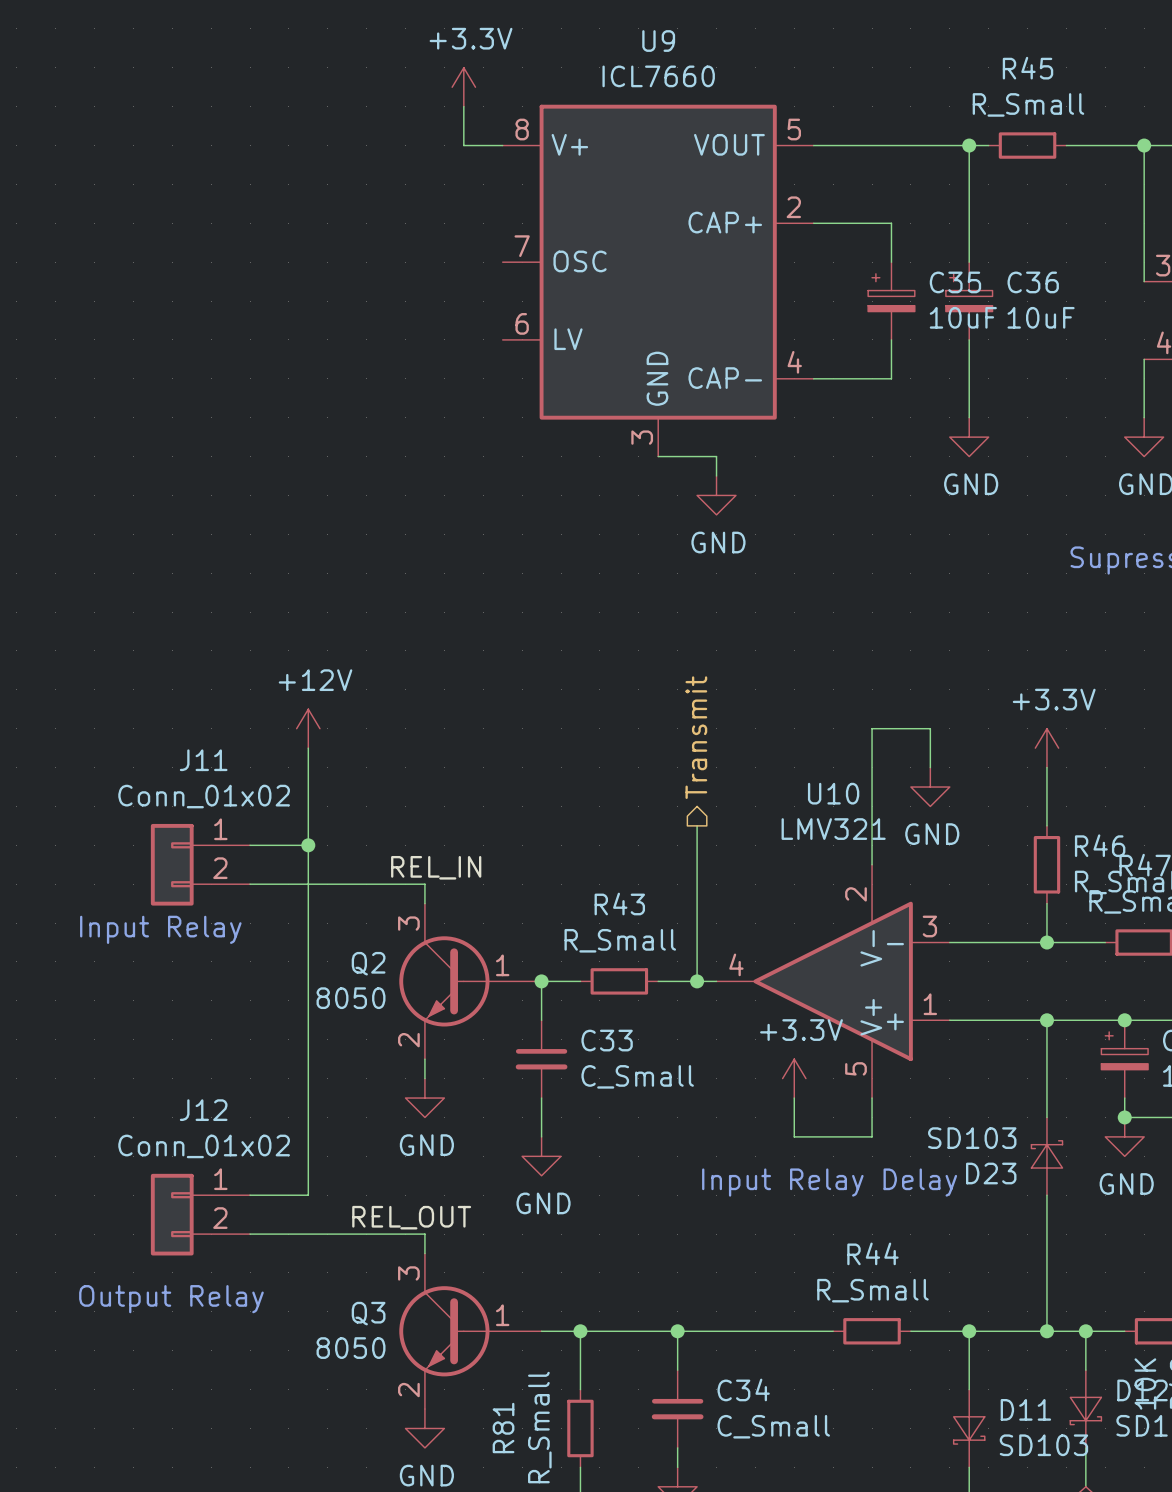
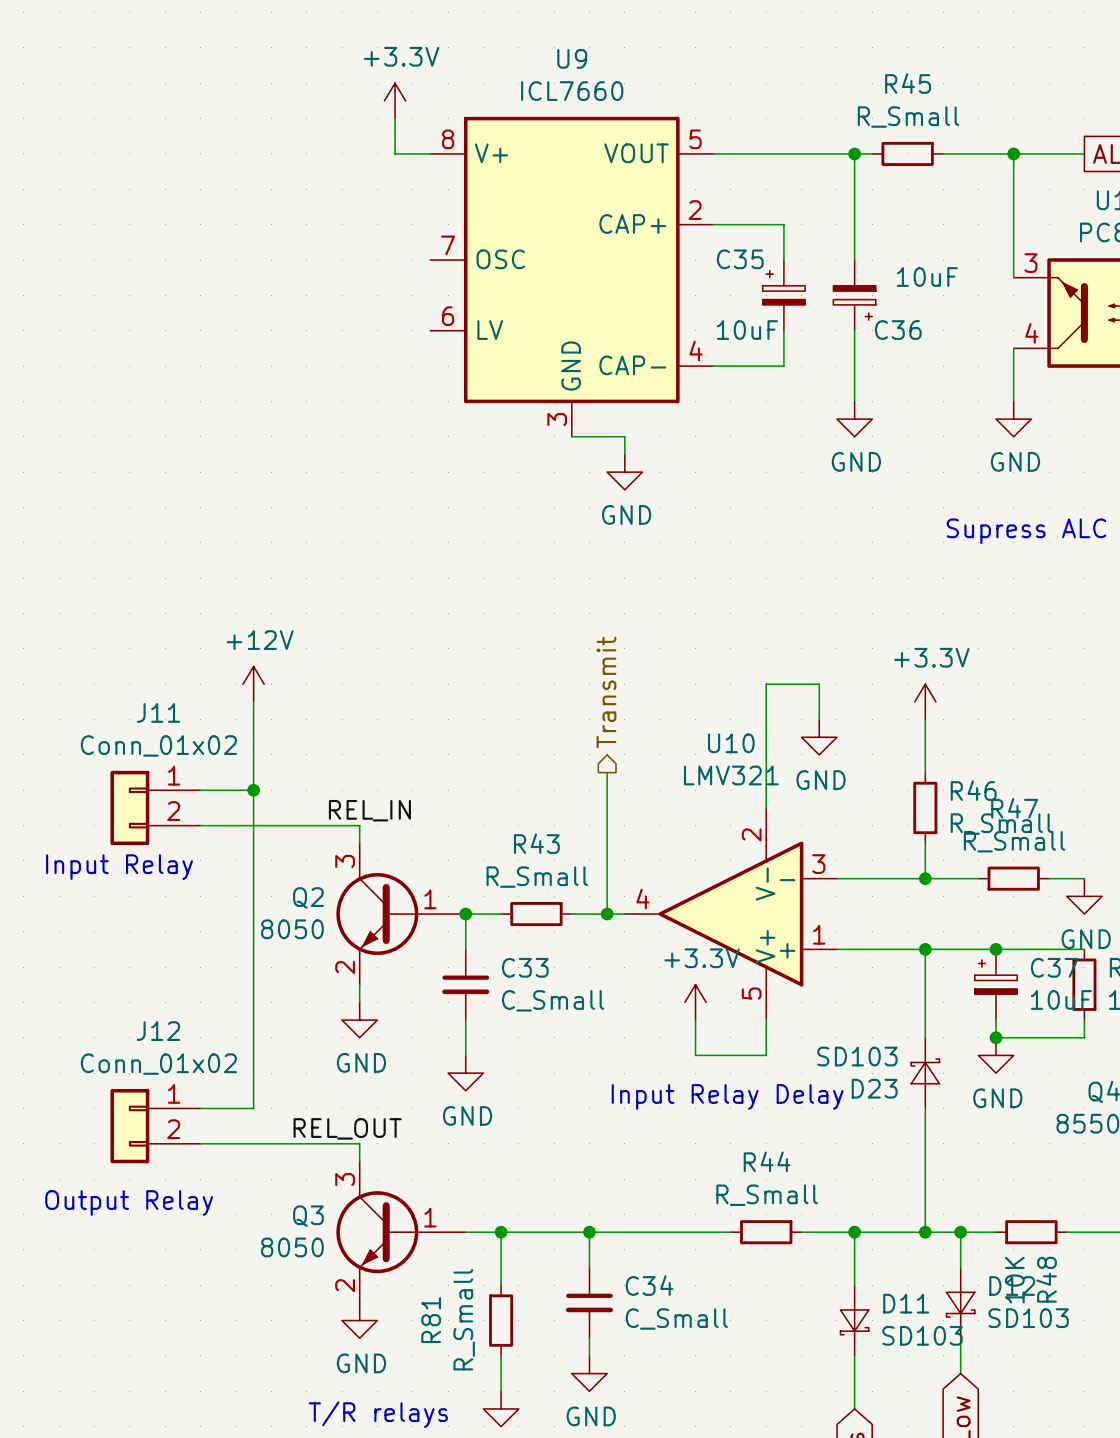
C35 name position: C35 (955, 282) -> C35 (740, 259)
C36 name position: C36 (1033, 282) -> C36 (898, 330)
C36 rotation: 0° (969, 292) -> 180° (854, 302)
C35 value position: 10uF (963, 317) -> 10uF (747, 330)
C36 value position: 10uF (1041, 317) -> 10uF (927, 277)

